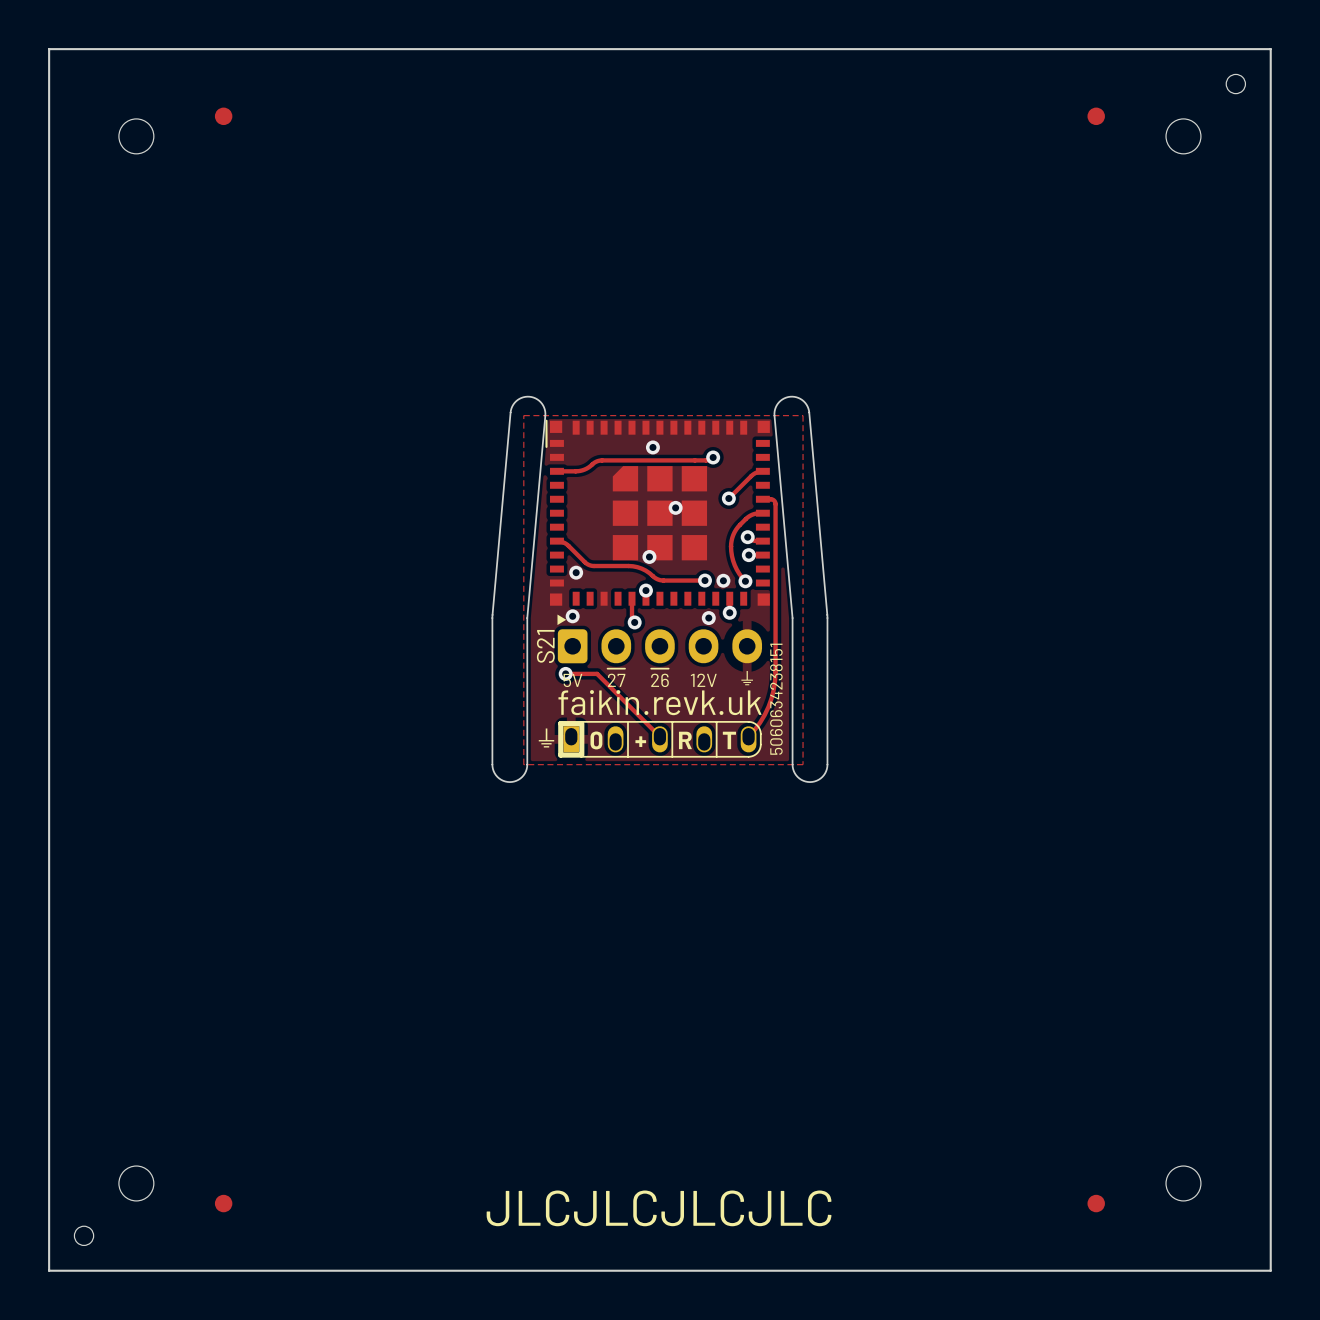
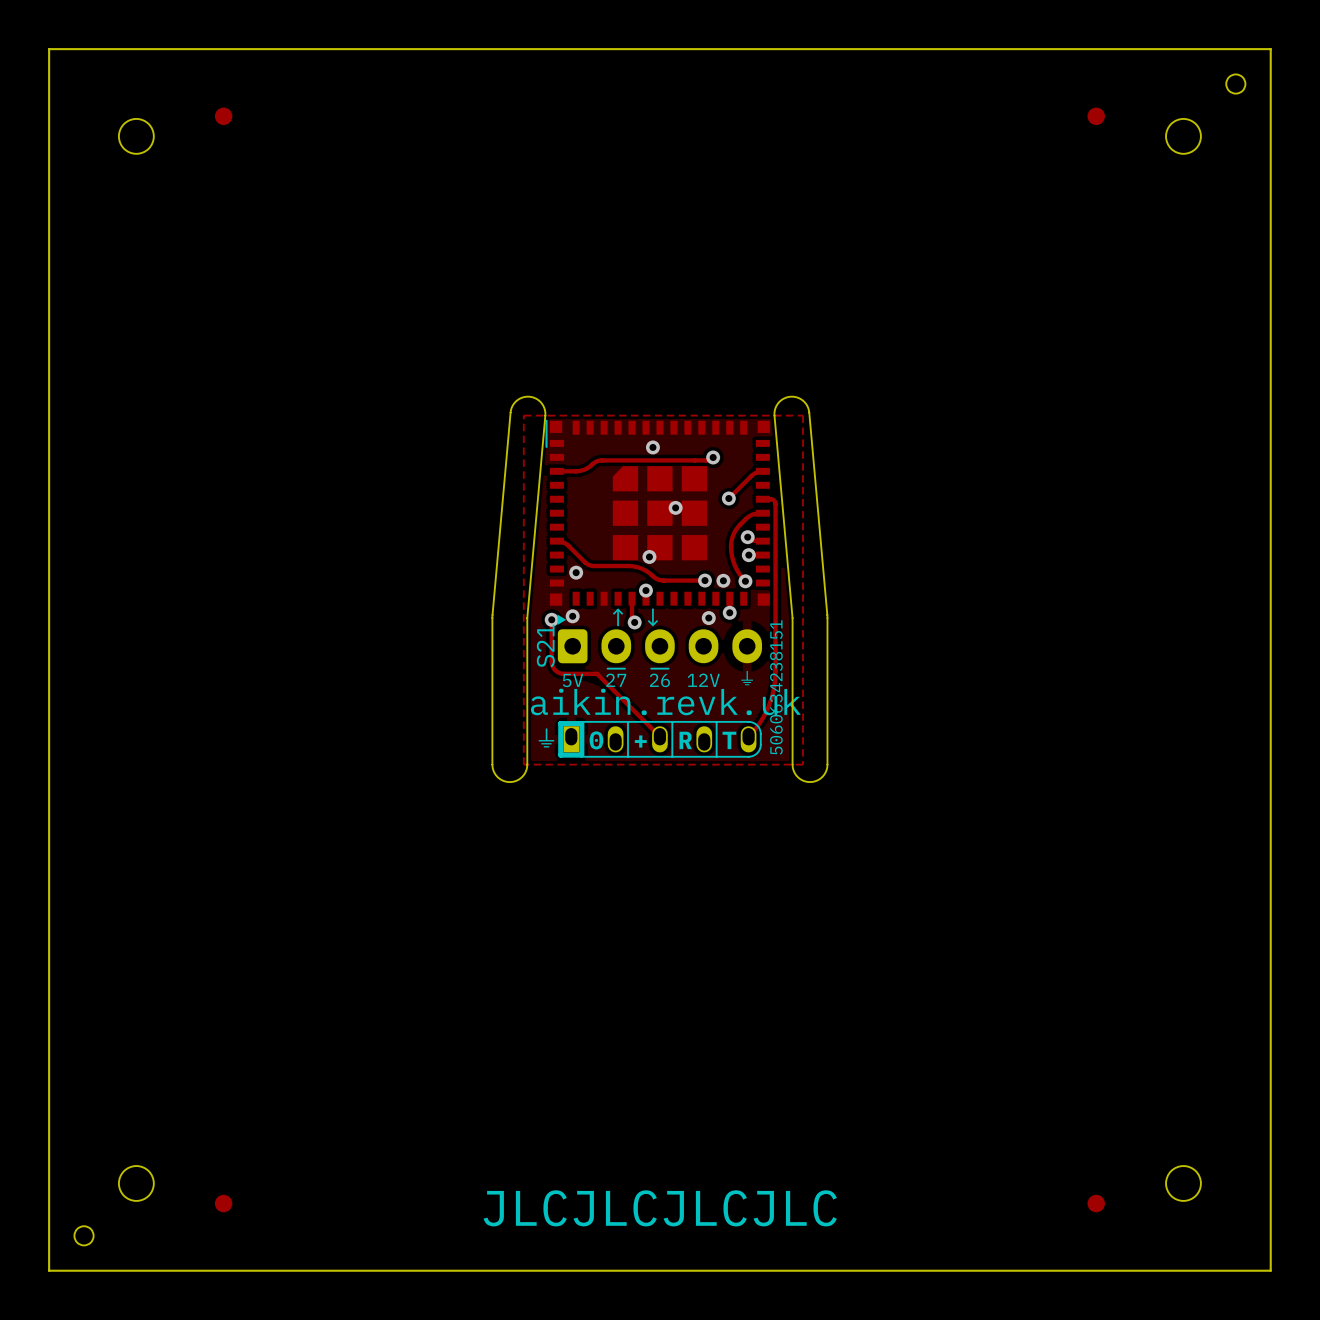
text: none -> ↑ (618, 617)
text: none -> ↓ (652, 617)
track: none -> (551, 619) (552, 664) (557, 672) (565, 673)
via position: (565, 673) -> (551, 619)
text: faikin.revk.uk (660, 702) -> aikin.revk.uk (665, 701)

